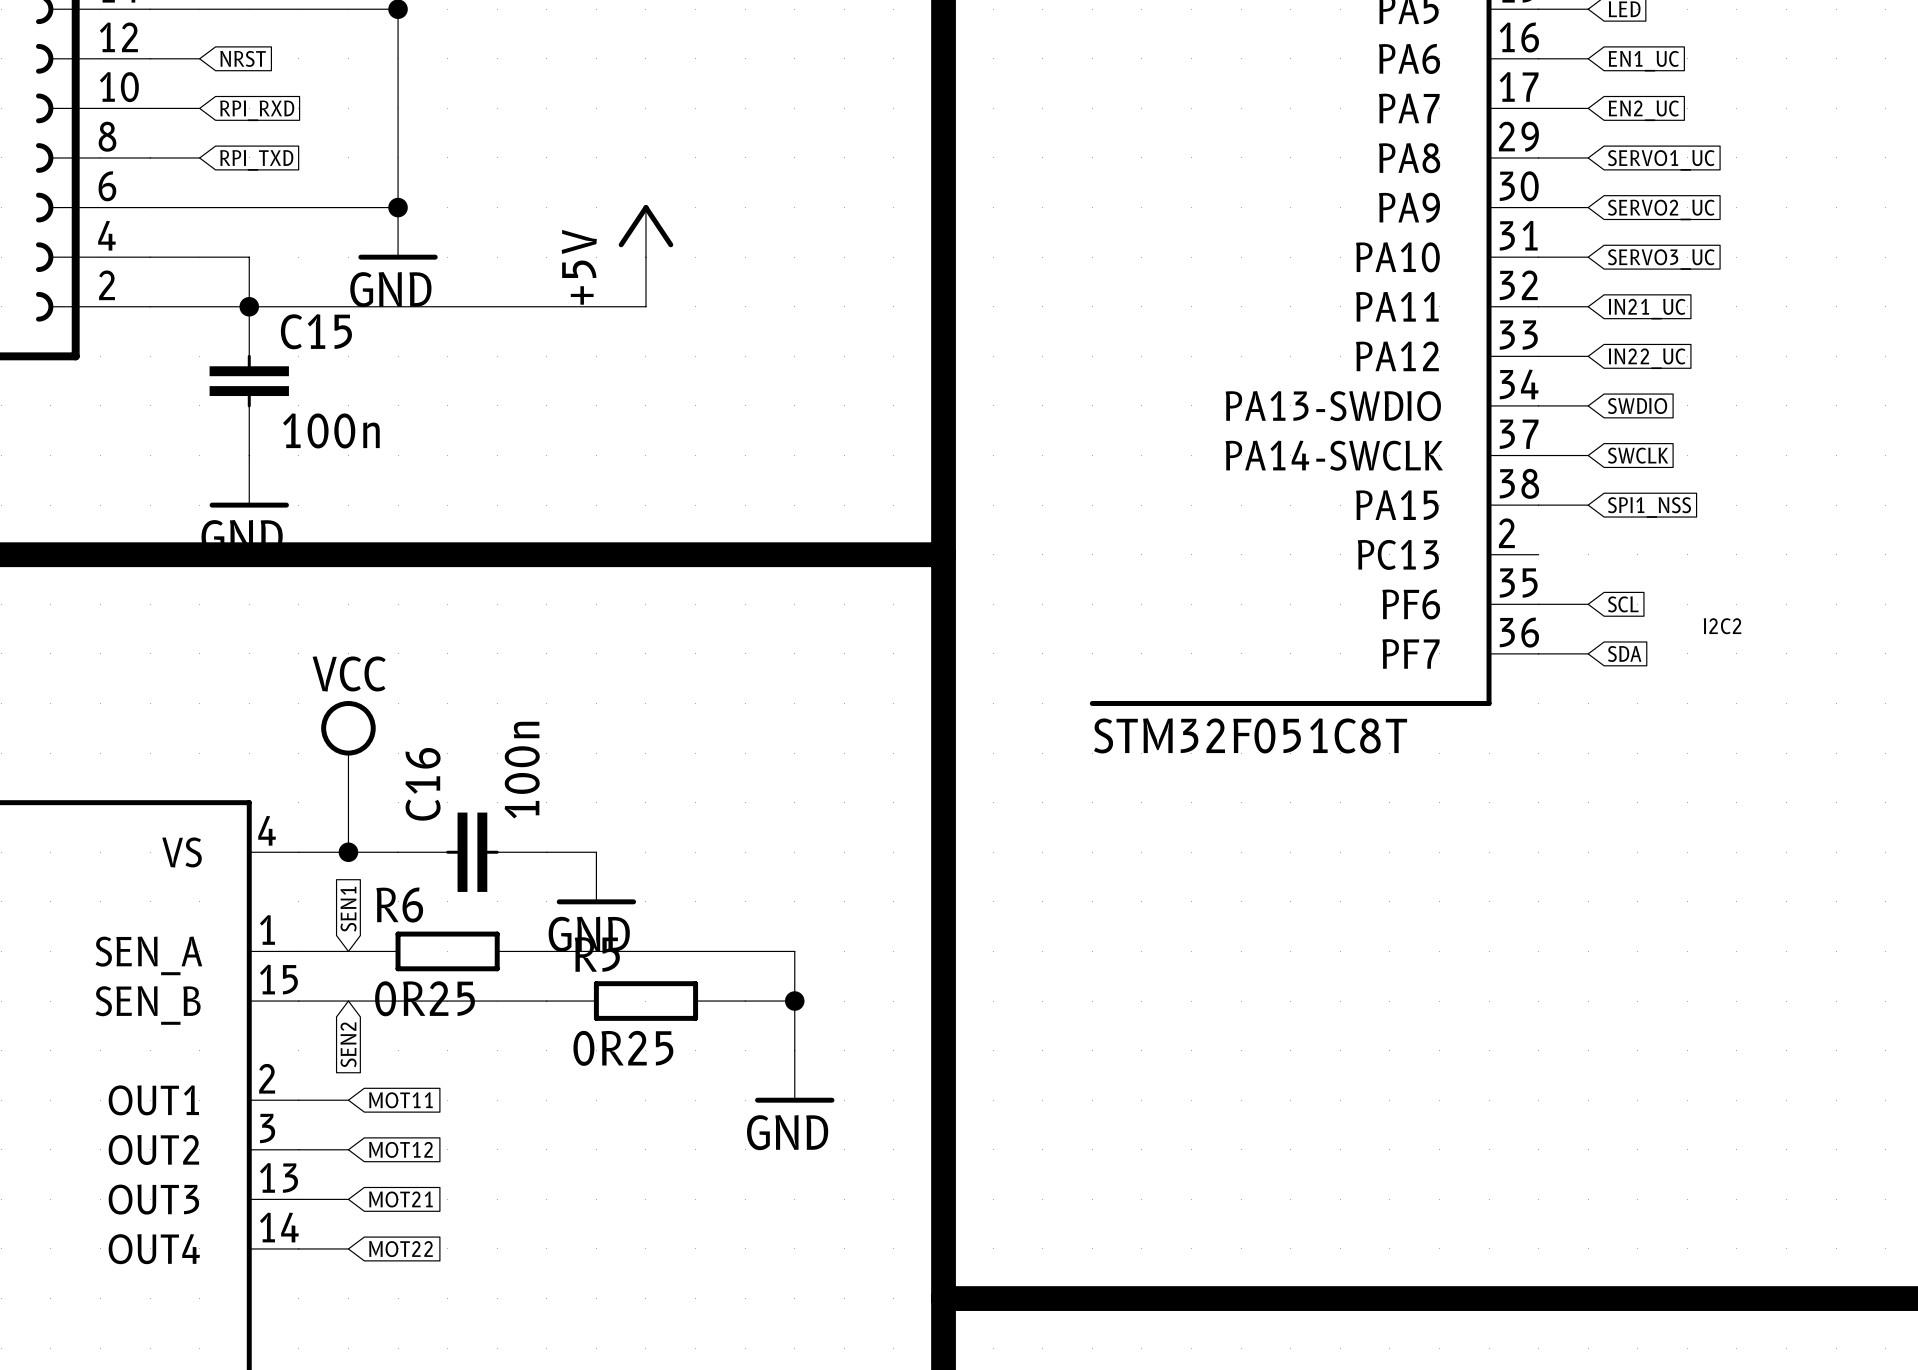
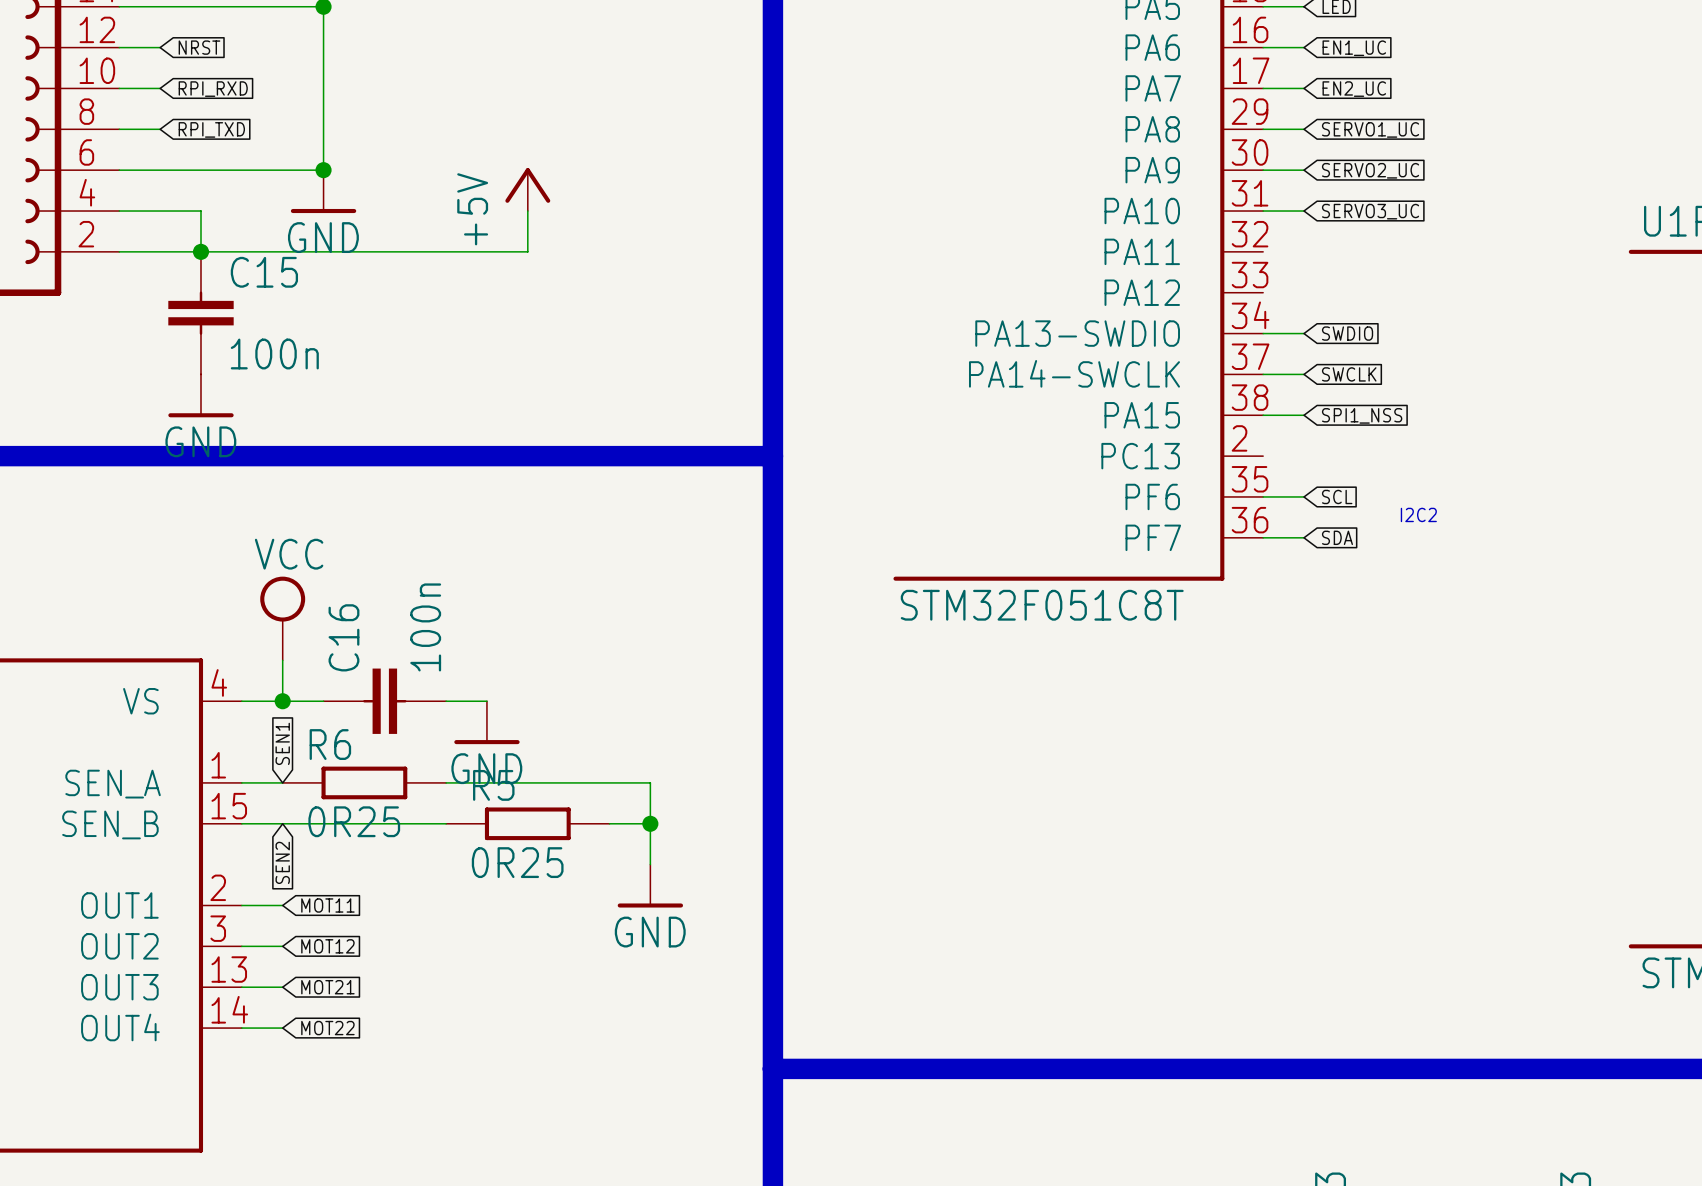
wire: (1538, 306) (1588, 306) -> none
global label: IN21_UC (1647, 309) -> none
wire: (1538, 356) (1588, 356) -> none
global label: IN22_UC (1647, 358) -> none

